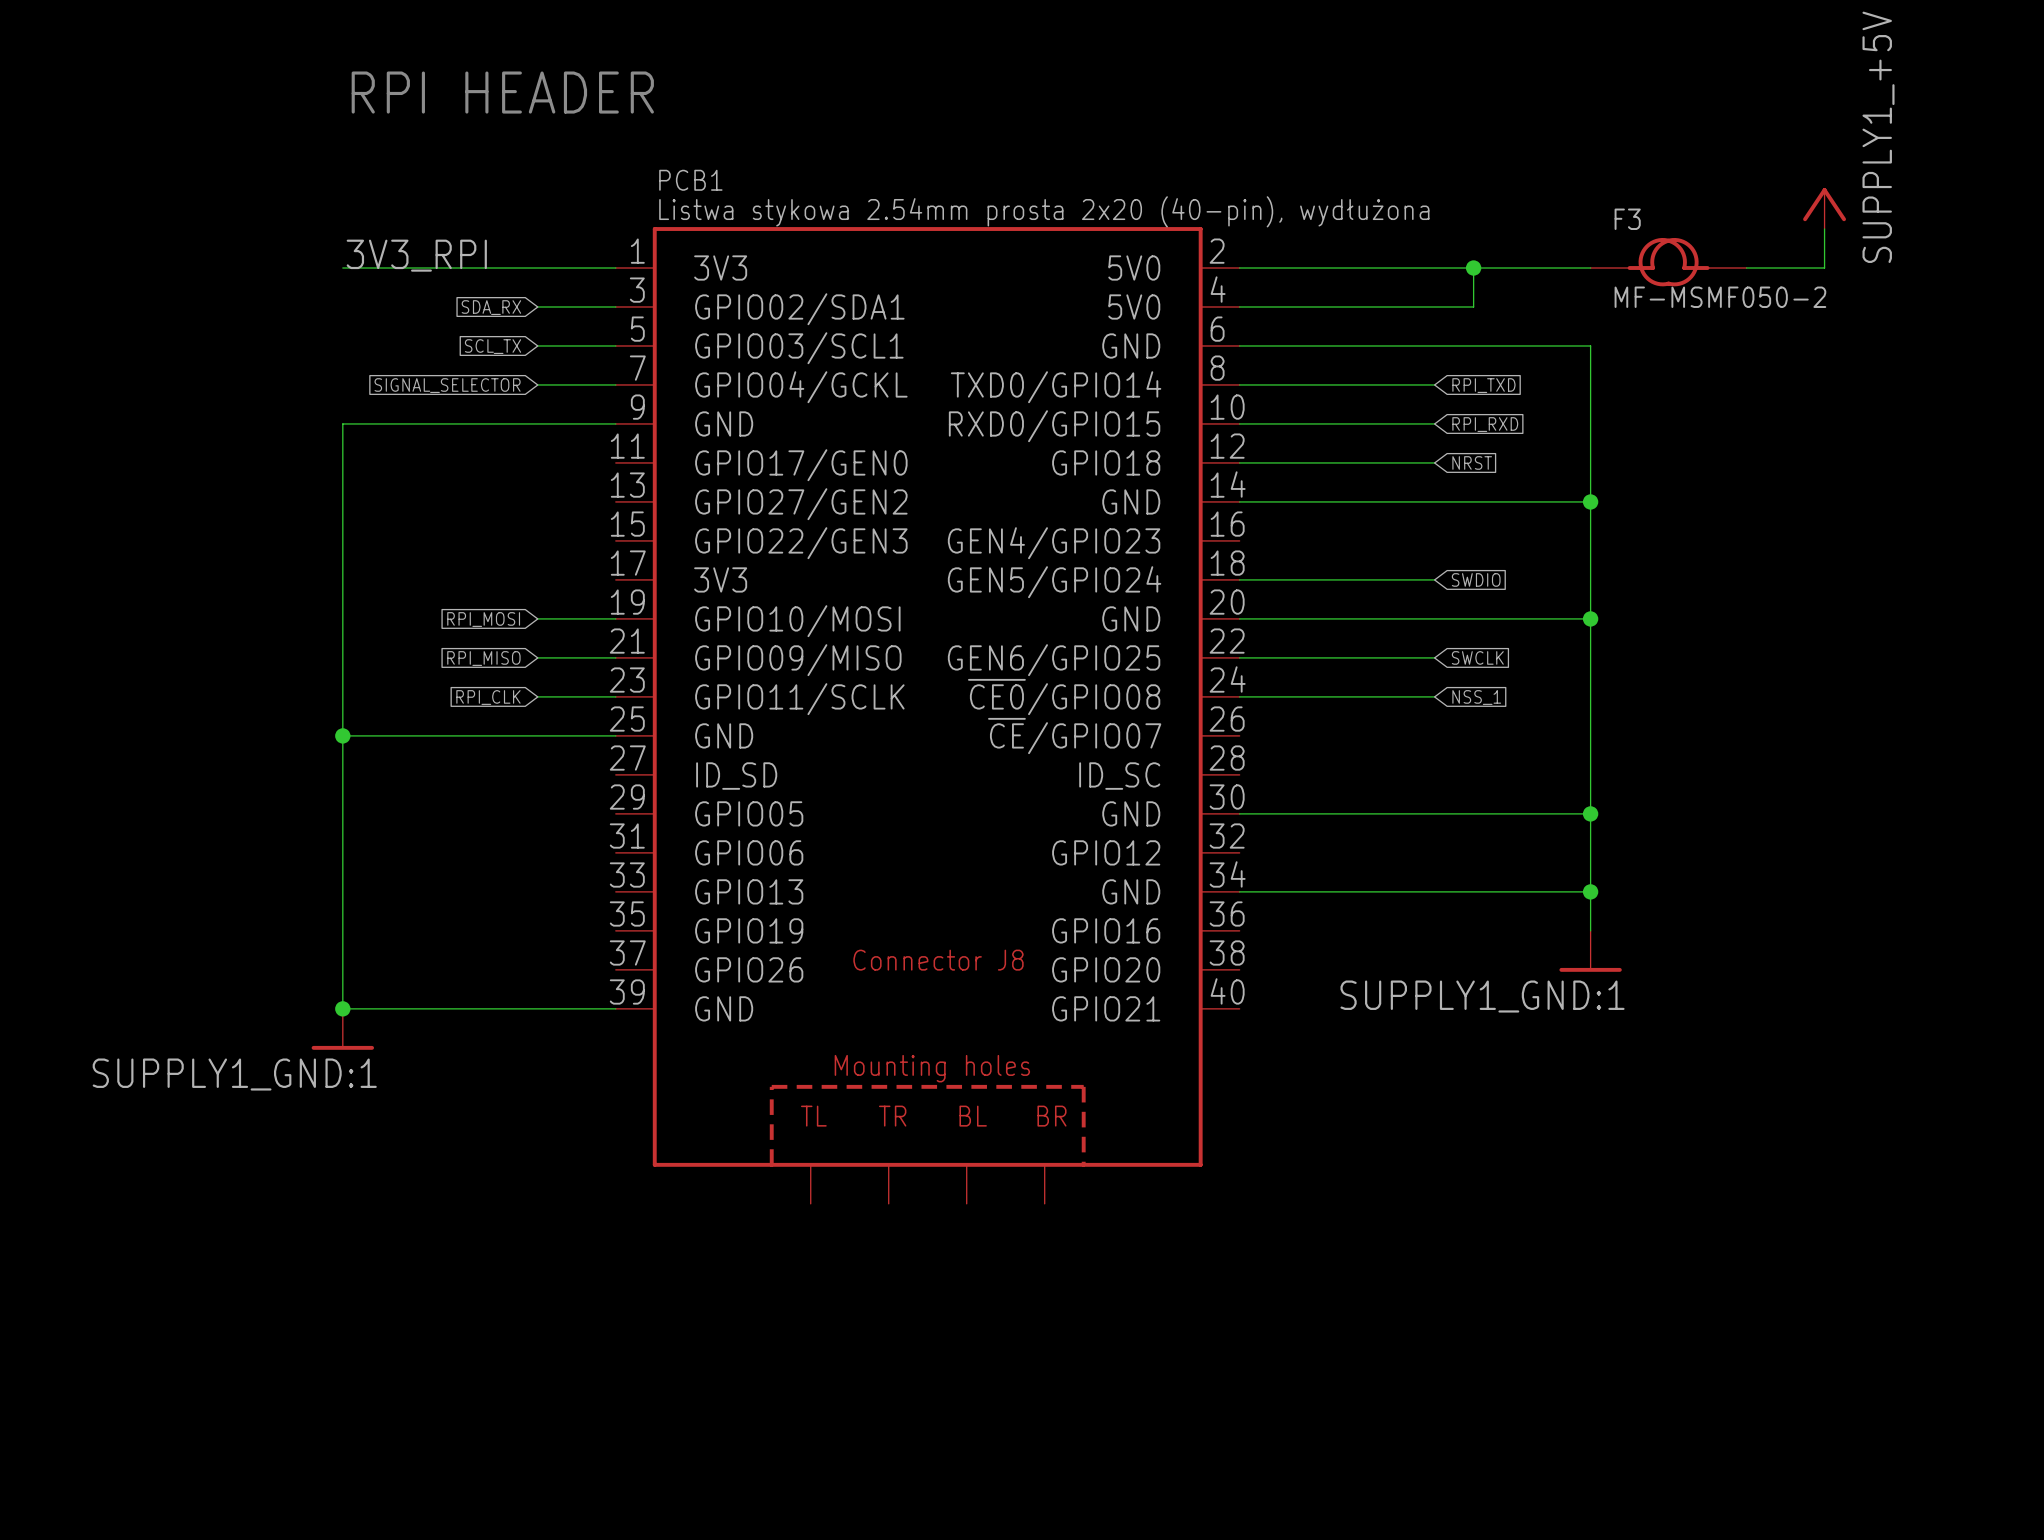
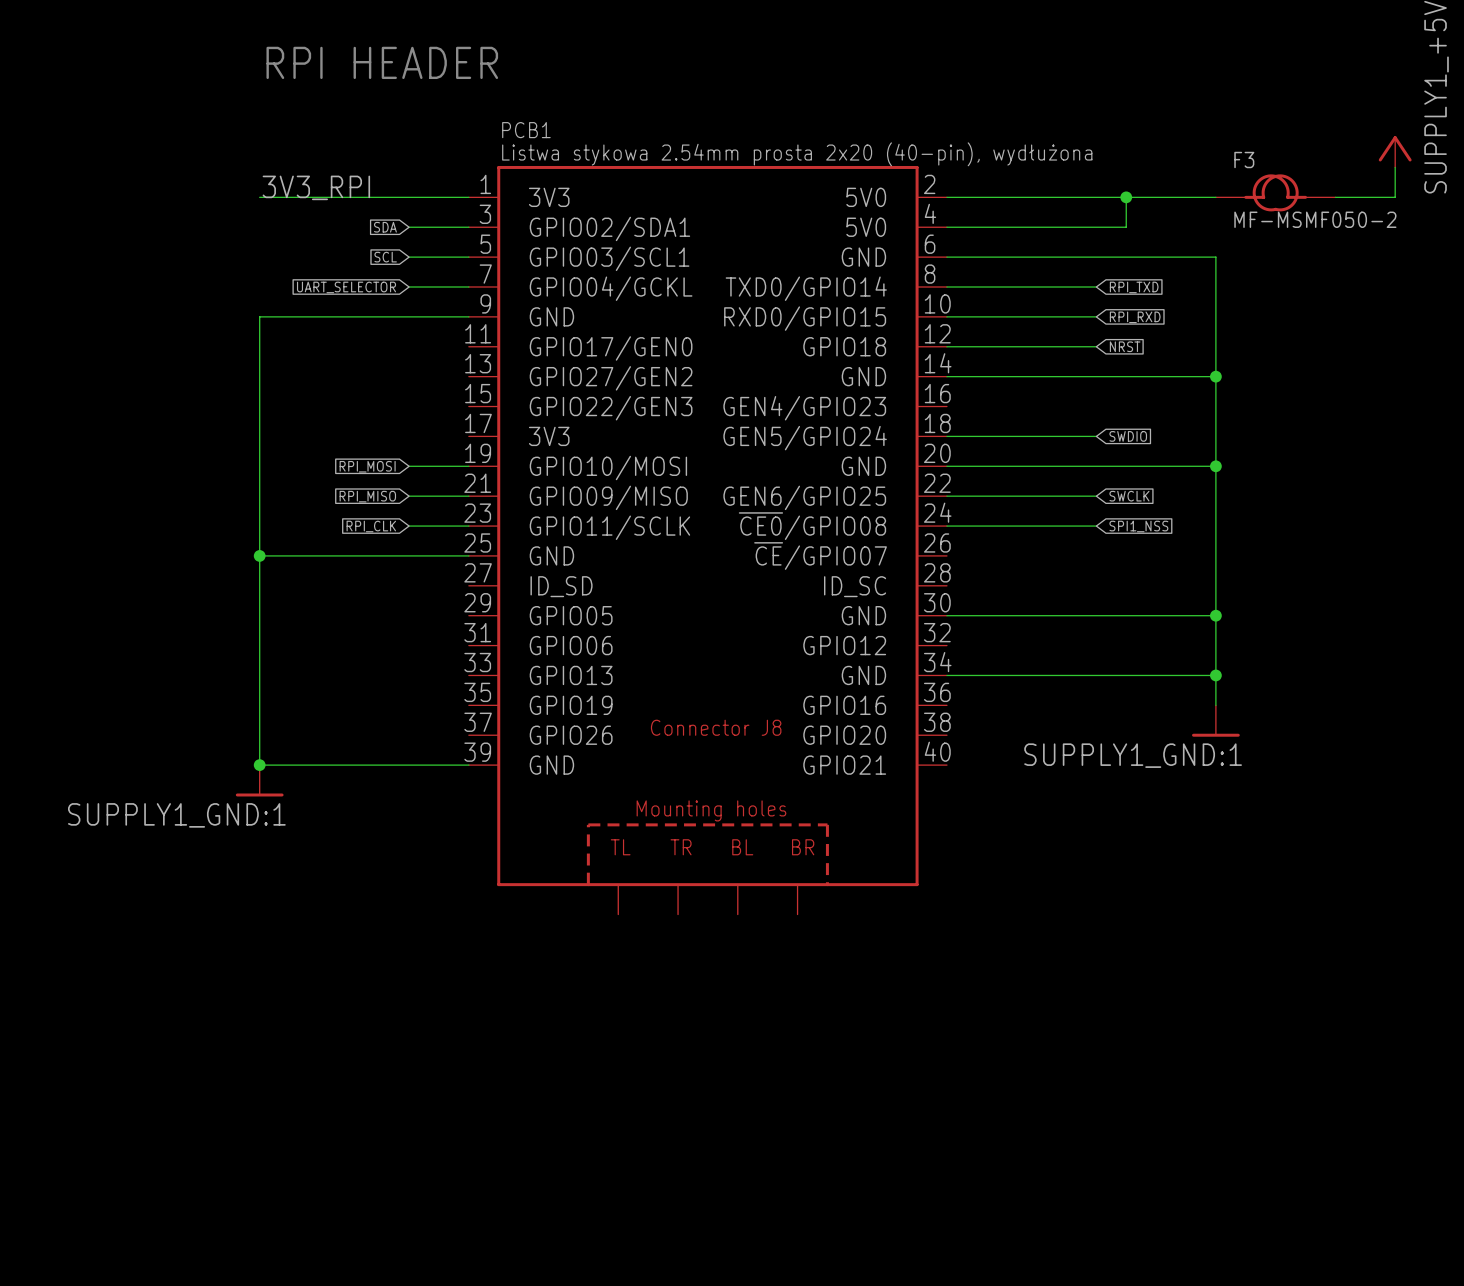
global label: SDA_RX (491, 307) -> SDA (385, 227)
global label: SCL_TX (493, 346) -> SCL (385, 257)
global label: SIGNAL_SELECTOR (447, 385) -> UART_SELECTOR (346, 287)
global label: NSS_1 (1476, 697) -> SPI1_NSS (1138, 526)

